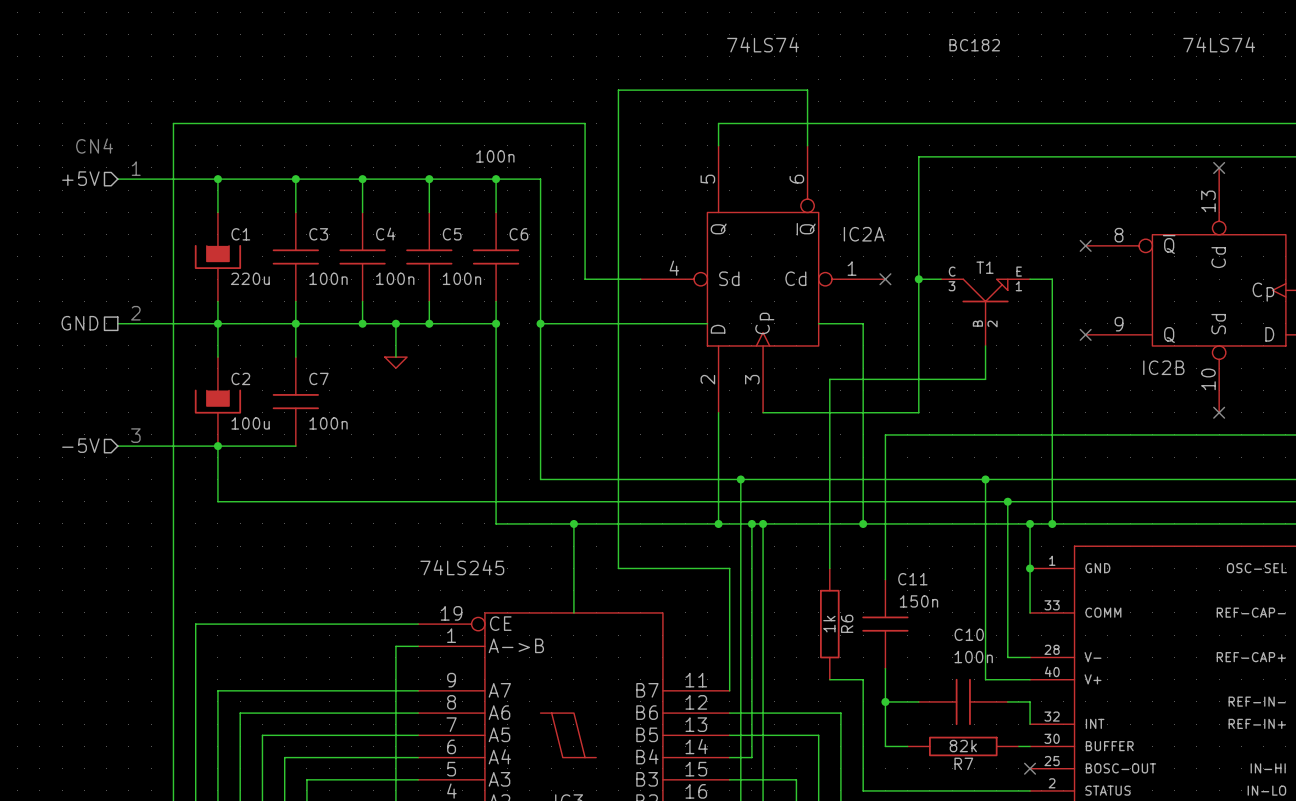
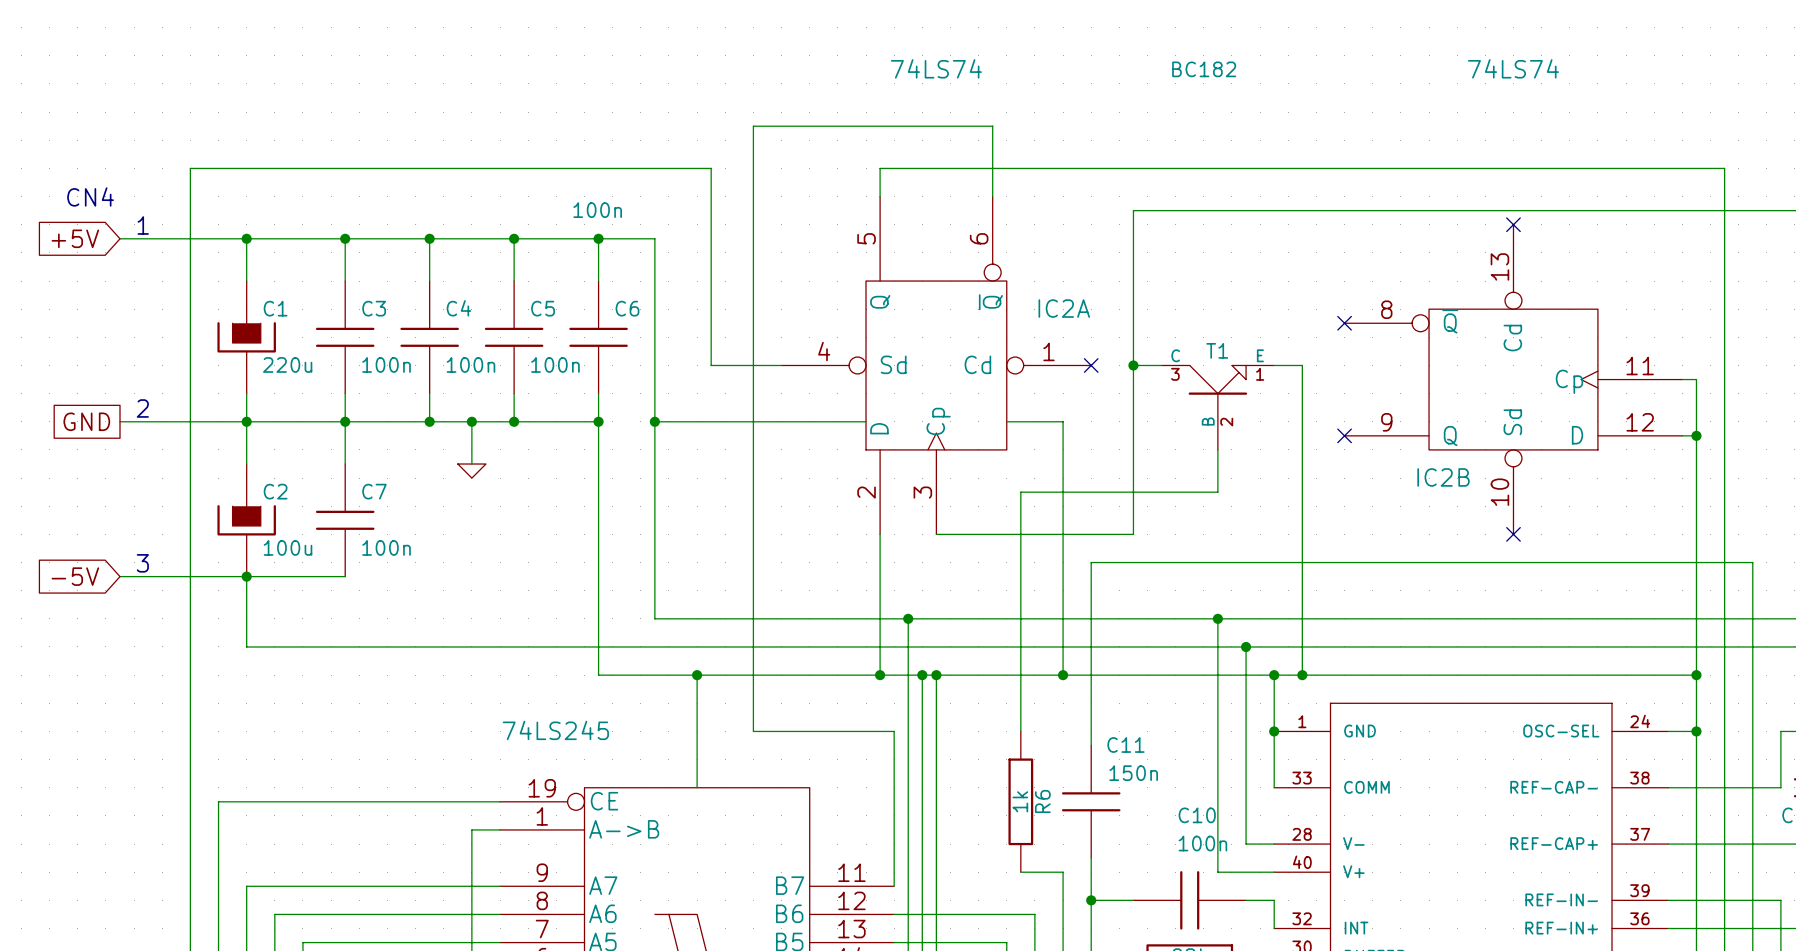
hierarchical label: +5V (80, 178) -> none
global label: none -> +5V (75, 238)
hierarchical label: GND (79, 323) -> none
global label: none -> GND (86, 421)
hierarchical label: -5V (80, 445) -> none
global label: none -> -5V (75, 576)

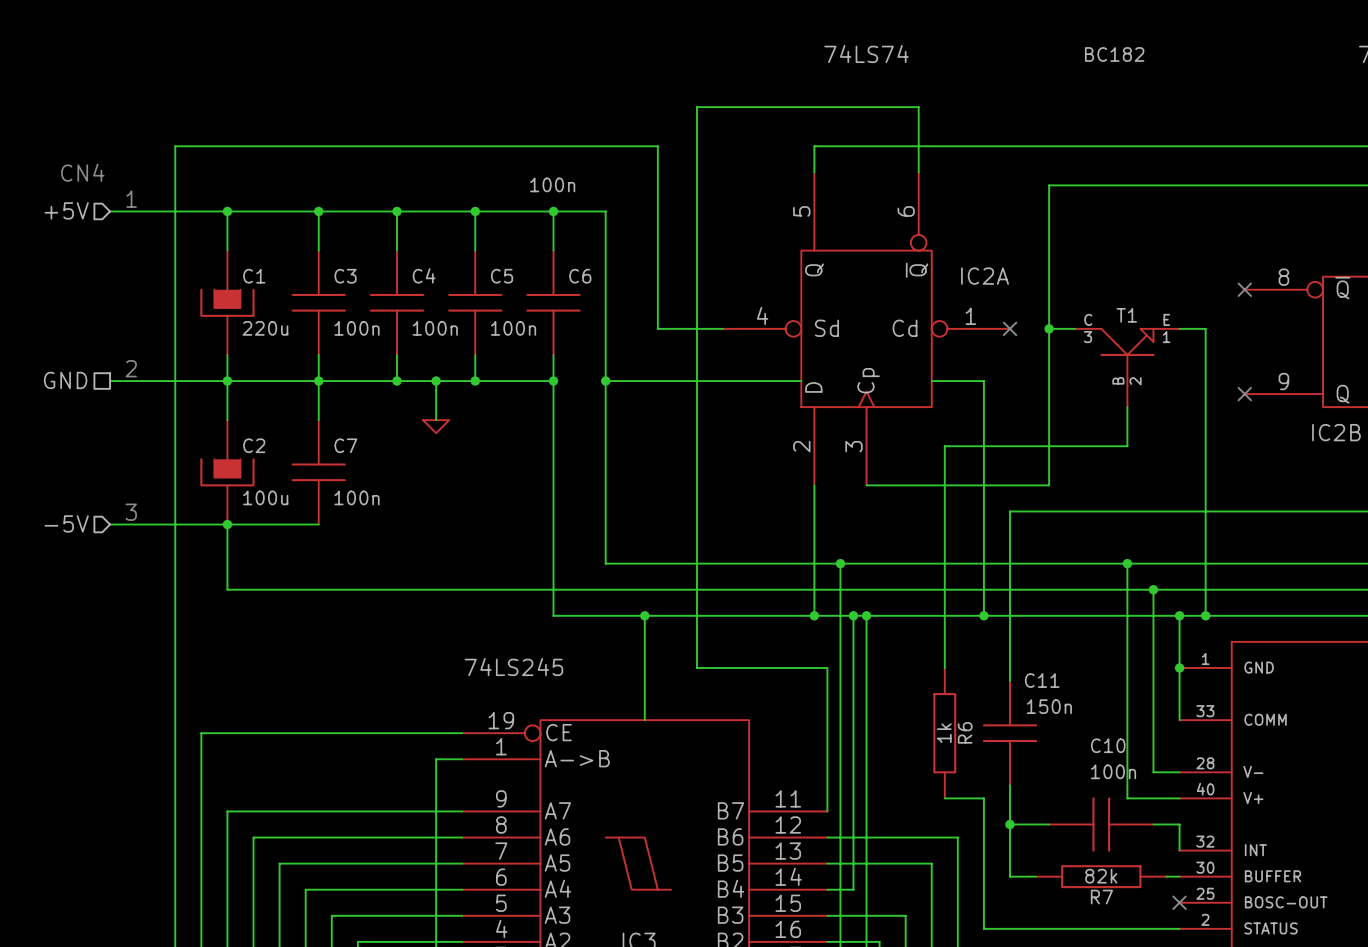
hierarchical label: none -> +5V (66, 210)
global label: +5V (75, 238) -> none
hierarchical label: none -> GND (65, 380)
global label: GND (86, 421) -> none
hierarchical label: none -> -5V (66, 523)
global label: -5V (75, 576) -> none

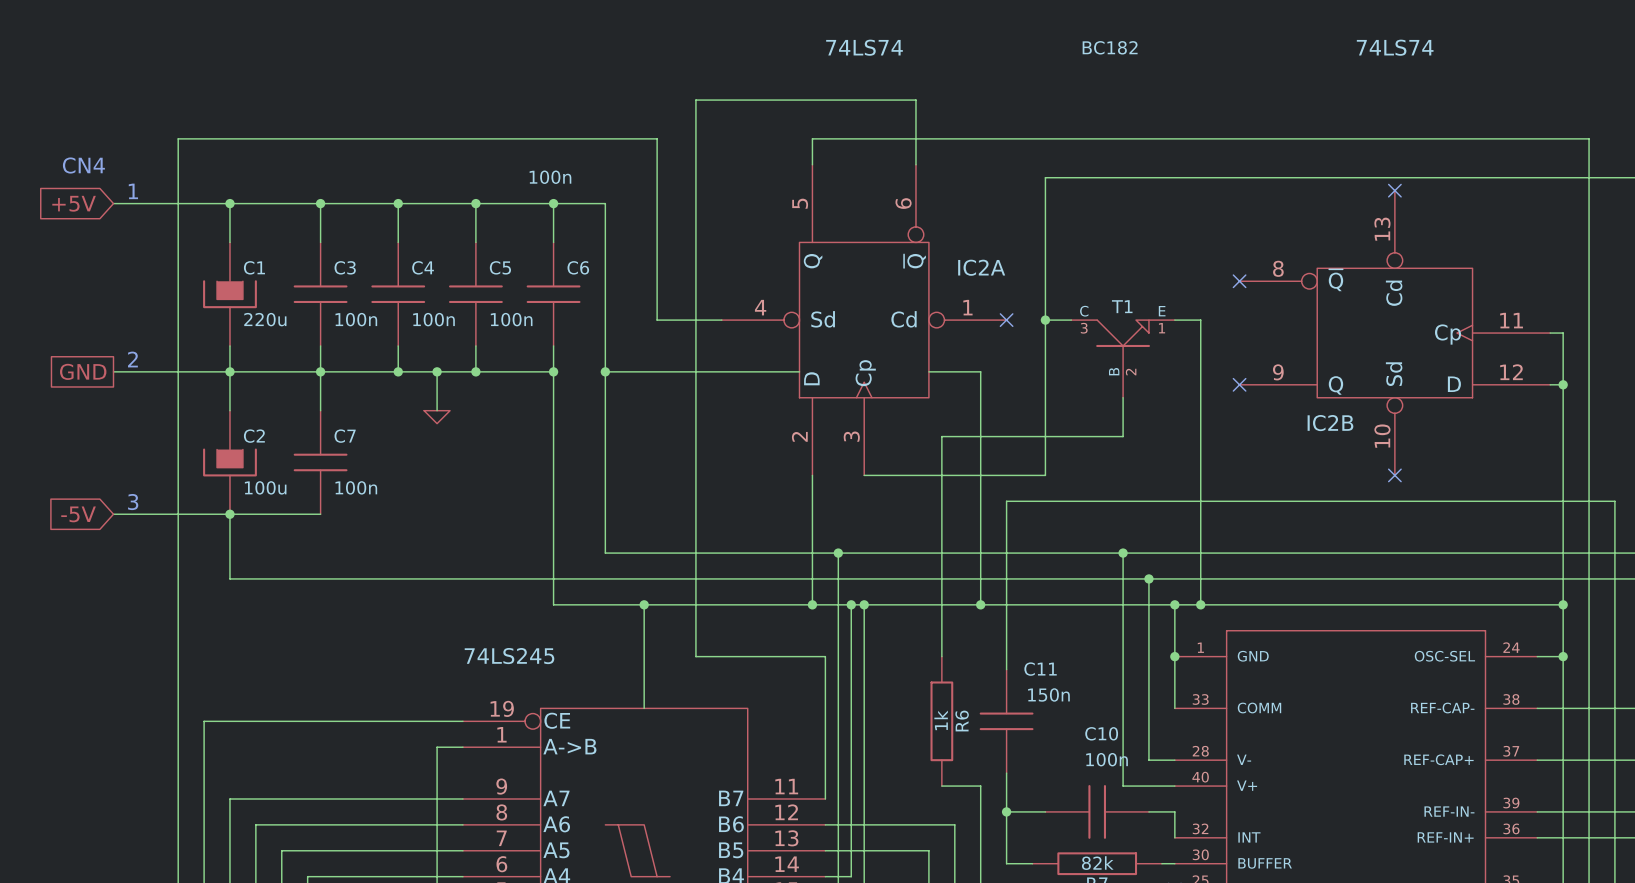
hierarchical label: +5V (66, 210) -> none
global label: none -> +5V (74, 203)
hierarchical label: GND (65, 380) -> none
global label: none -> GND (83, 371)
hierarchical label: -5V (66, 523) -> none
global label: none -> -5V (78, 514)

